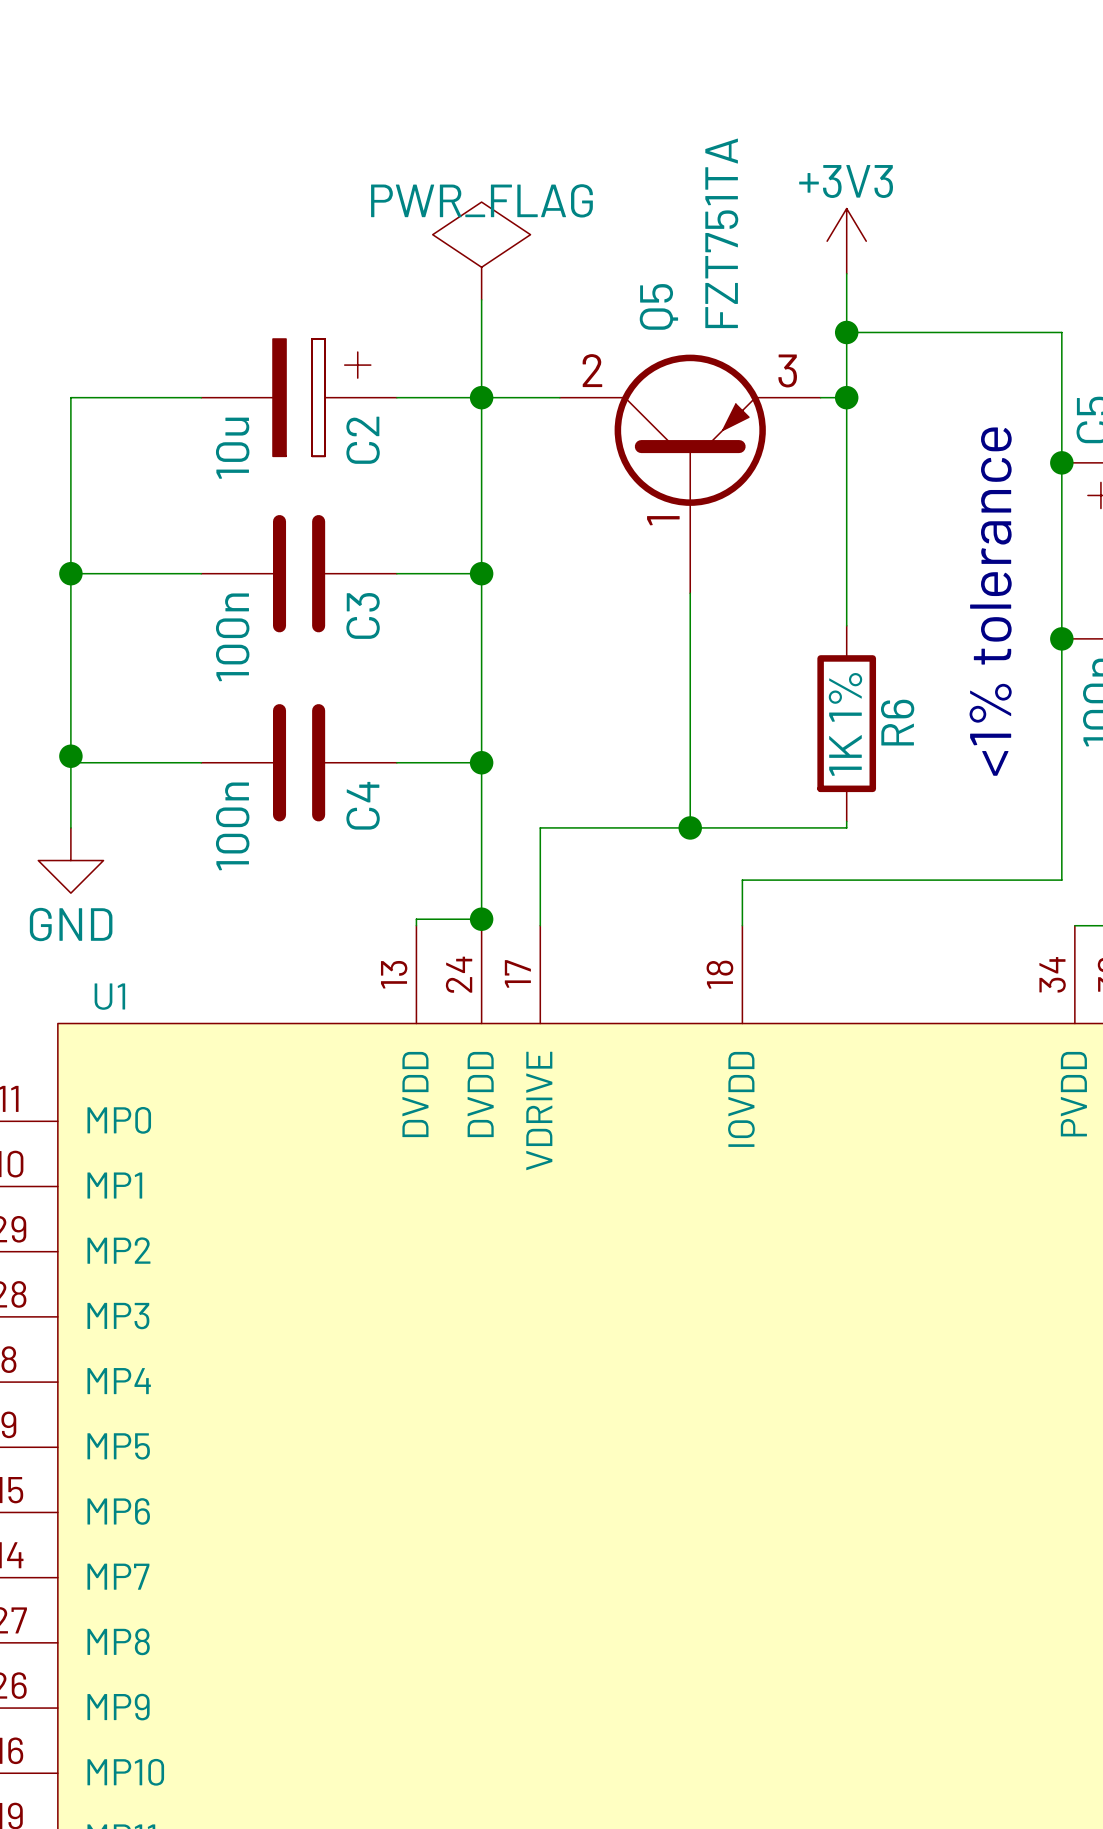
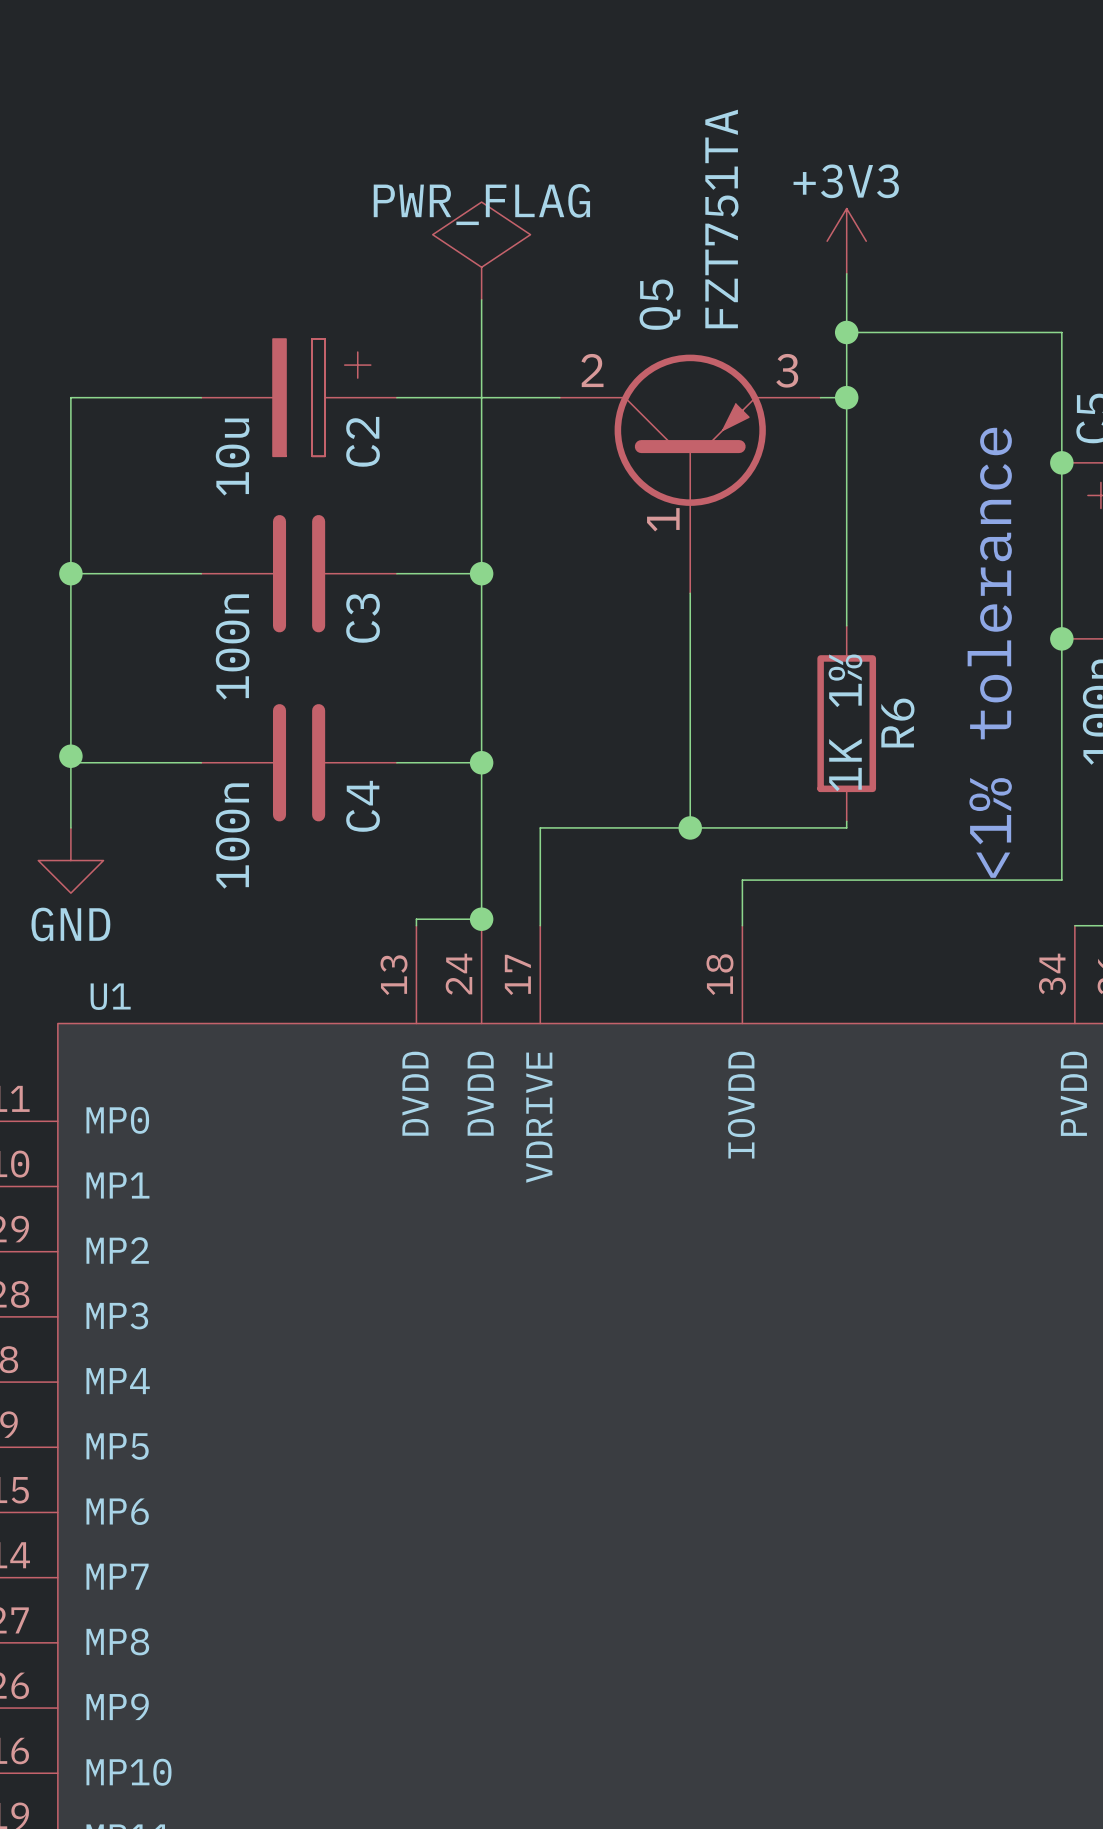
junction: (481, 397) -> none

